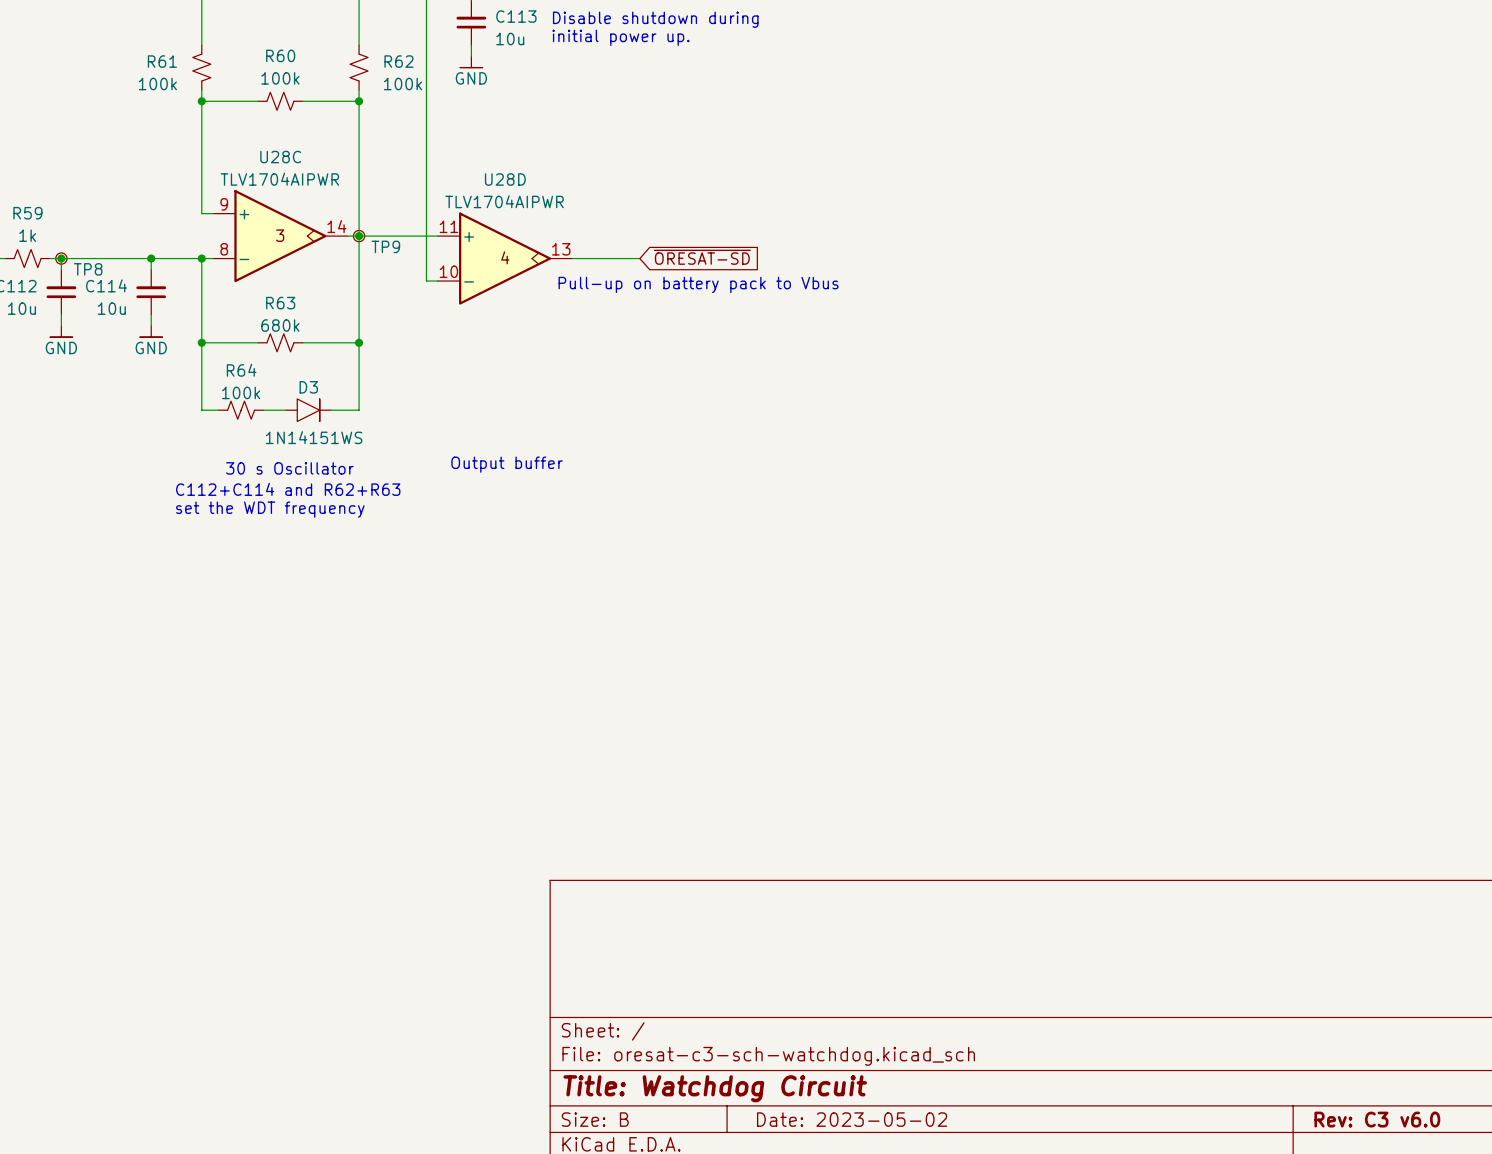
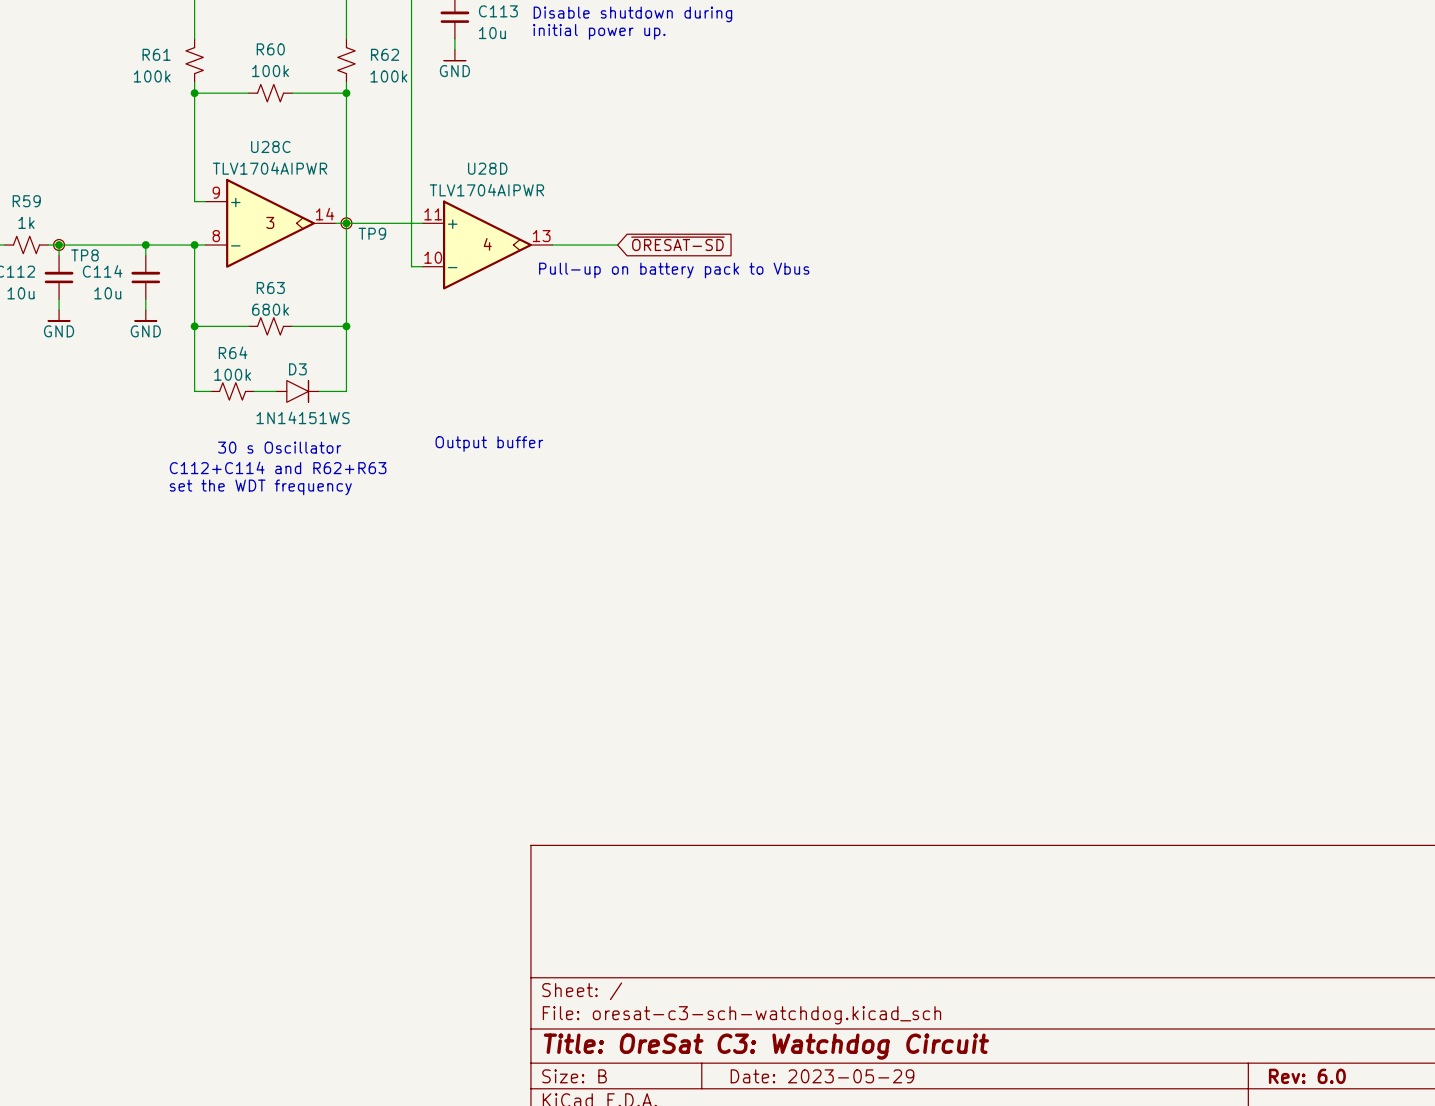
title block: Title: Watchdog Circuit (715, 1088) -> Title: OreSat C3: Watchdog Circuit (766, 1046)
title block: Date: 2023-05-02 (852, 1119) -> Date: 2023-05-29 (822, 1076)
title block: Rev: C3 v6.0 (1377, 1119) -> Rev: 6.0 (1307, 1076)

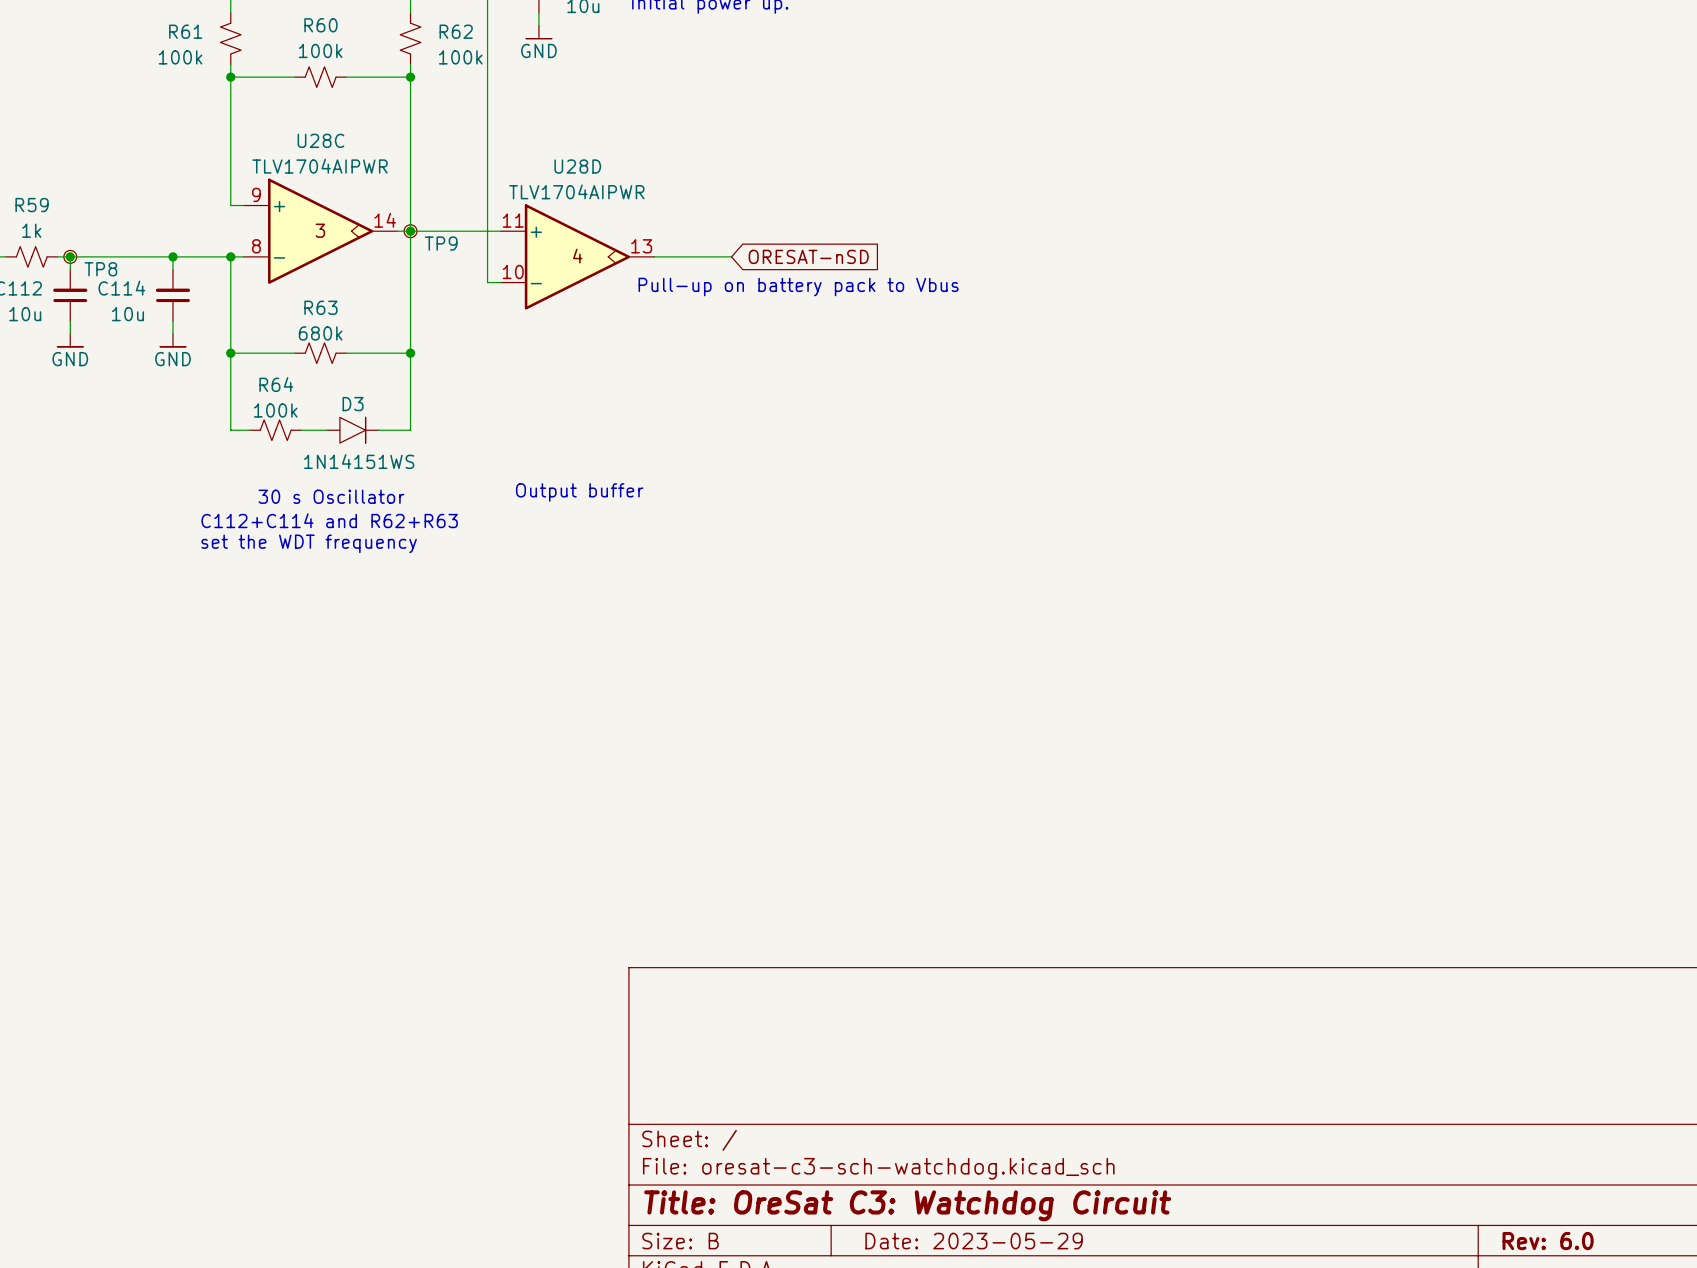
global label: ~{ORESAT-SD} (677, 243) -> ORESAT-nSD (808, 256)

